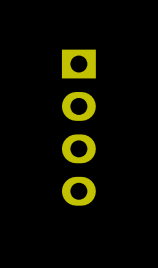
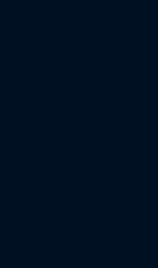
part: (78, 127) -> none

